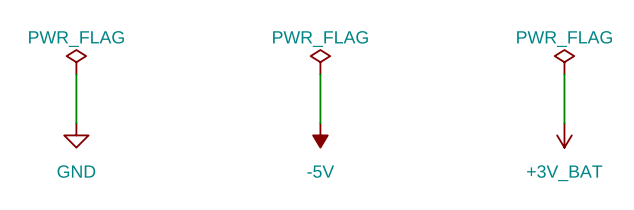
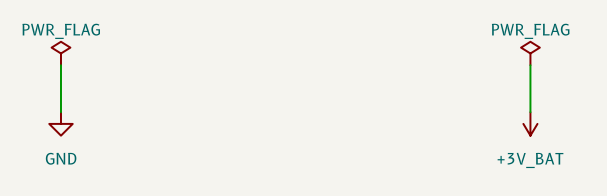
power symbol: PWR_FLAG (320, 62) -> none
wire: (320, 74) (320, 123) -> none
power symbol: -5V (320, 135) -> none

